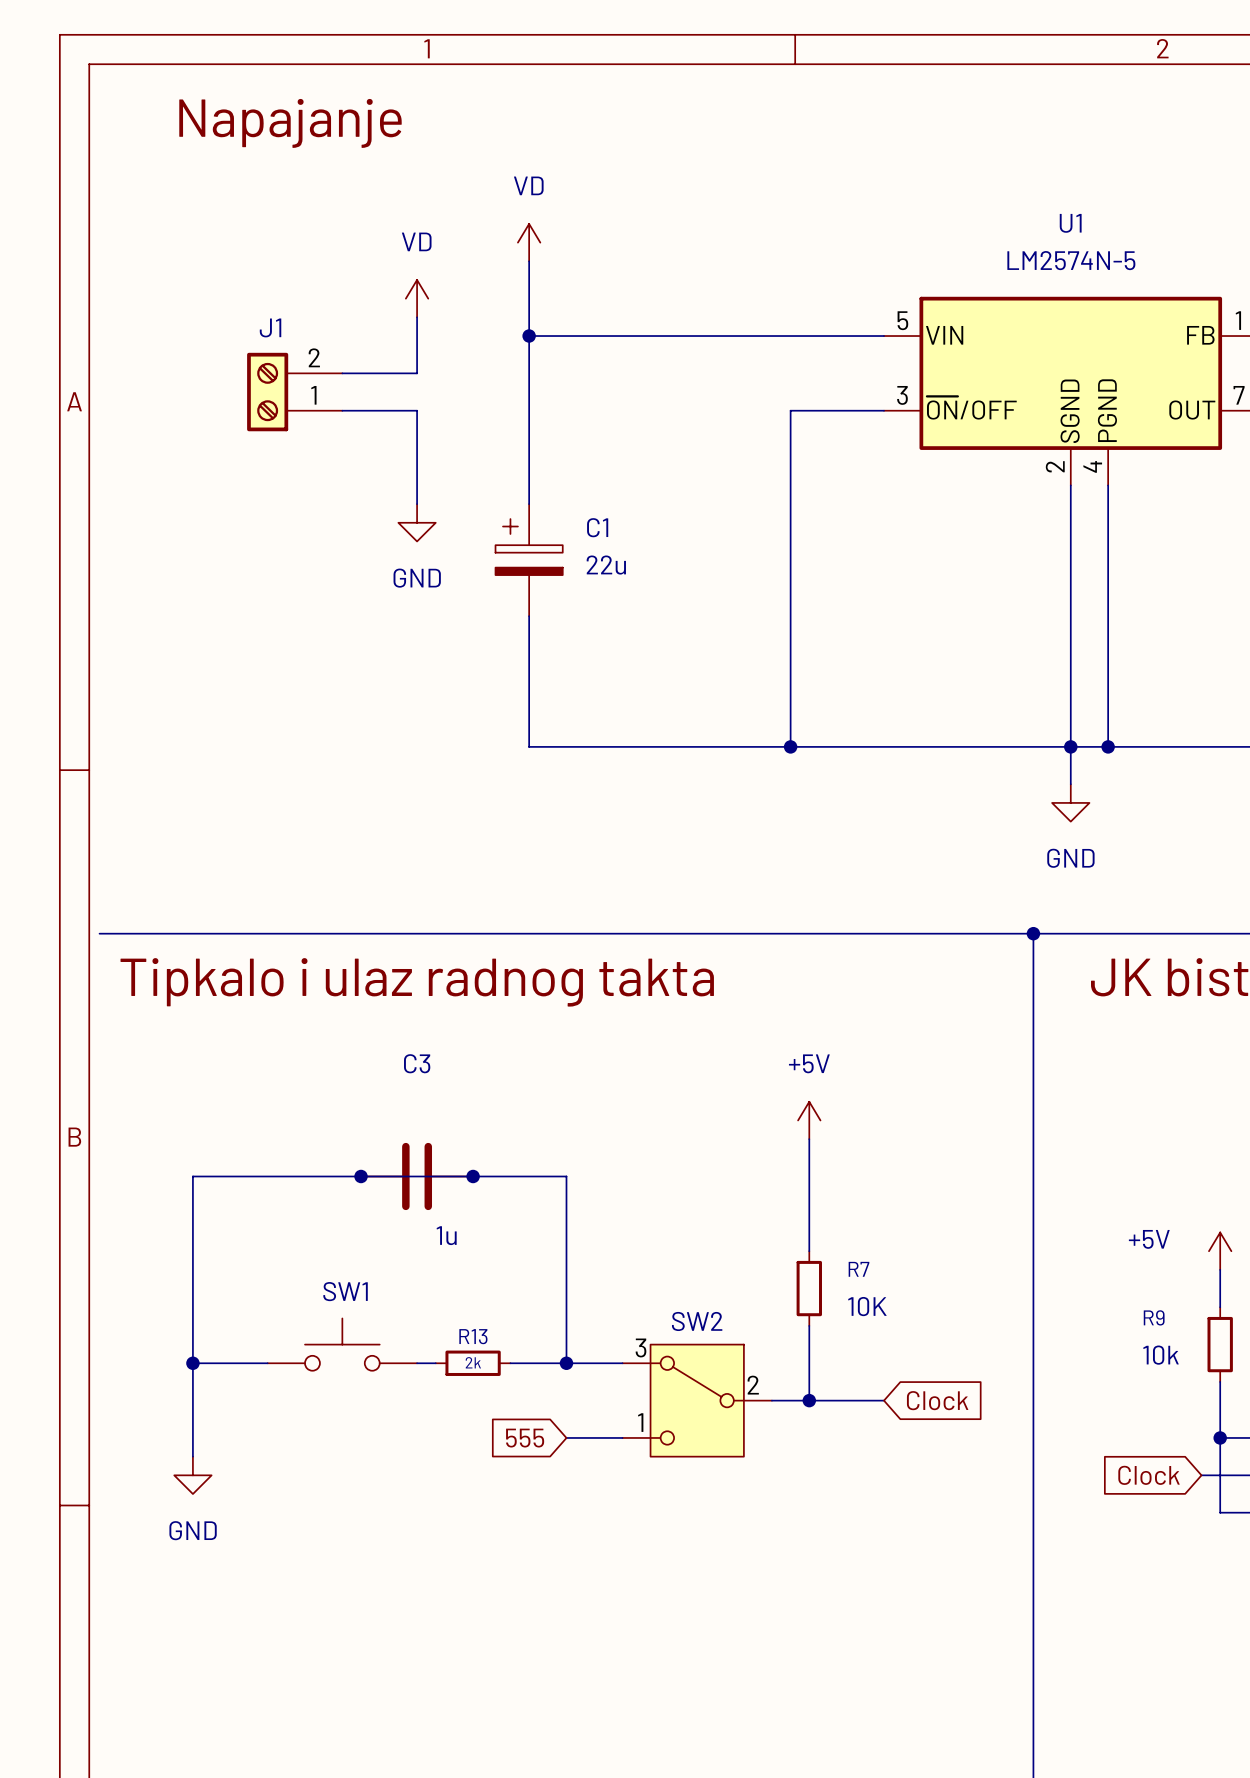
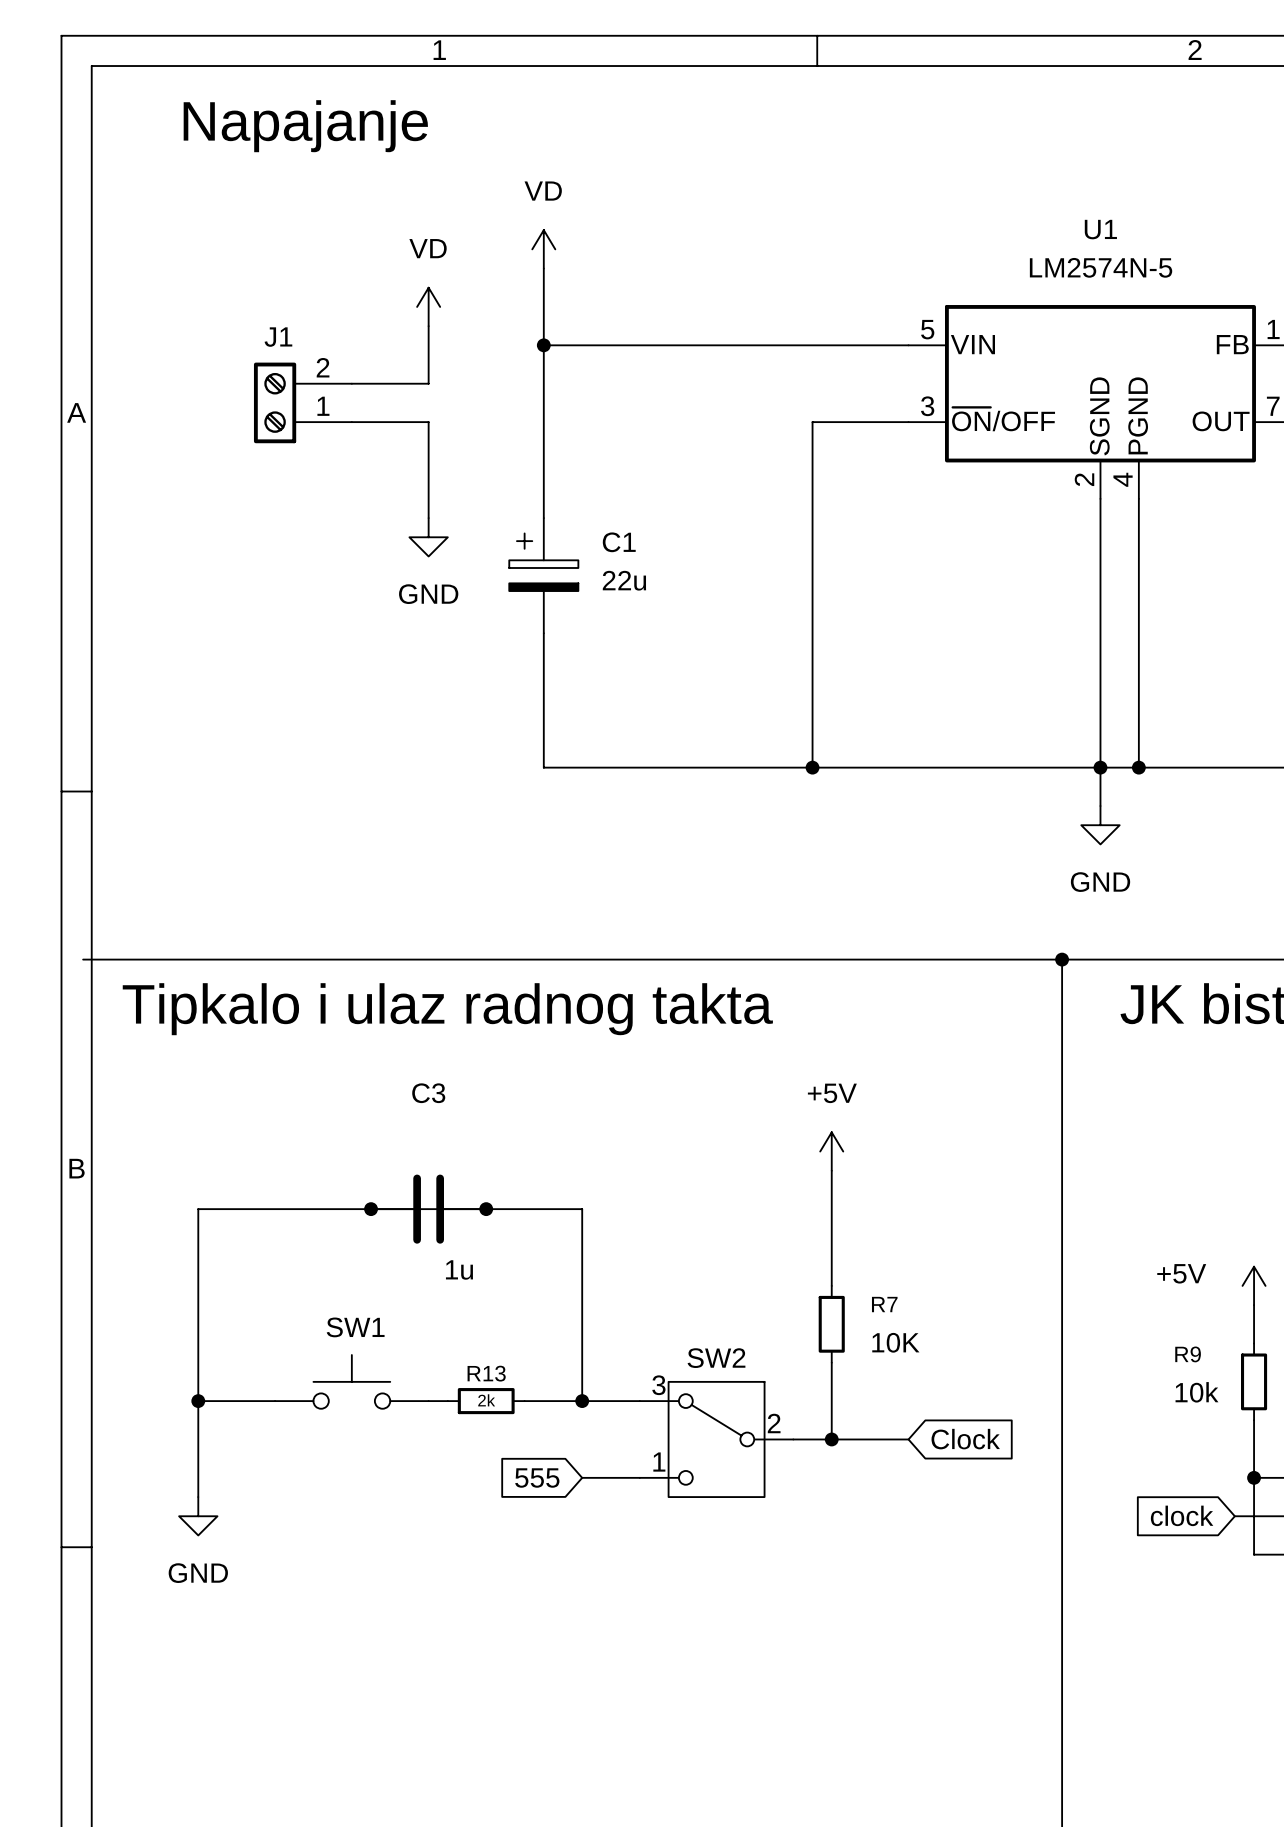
wire: none -> (83, 959) (102, 959)
global label: Clock (1149, 1475) -> clock (1182, 1515)

